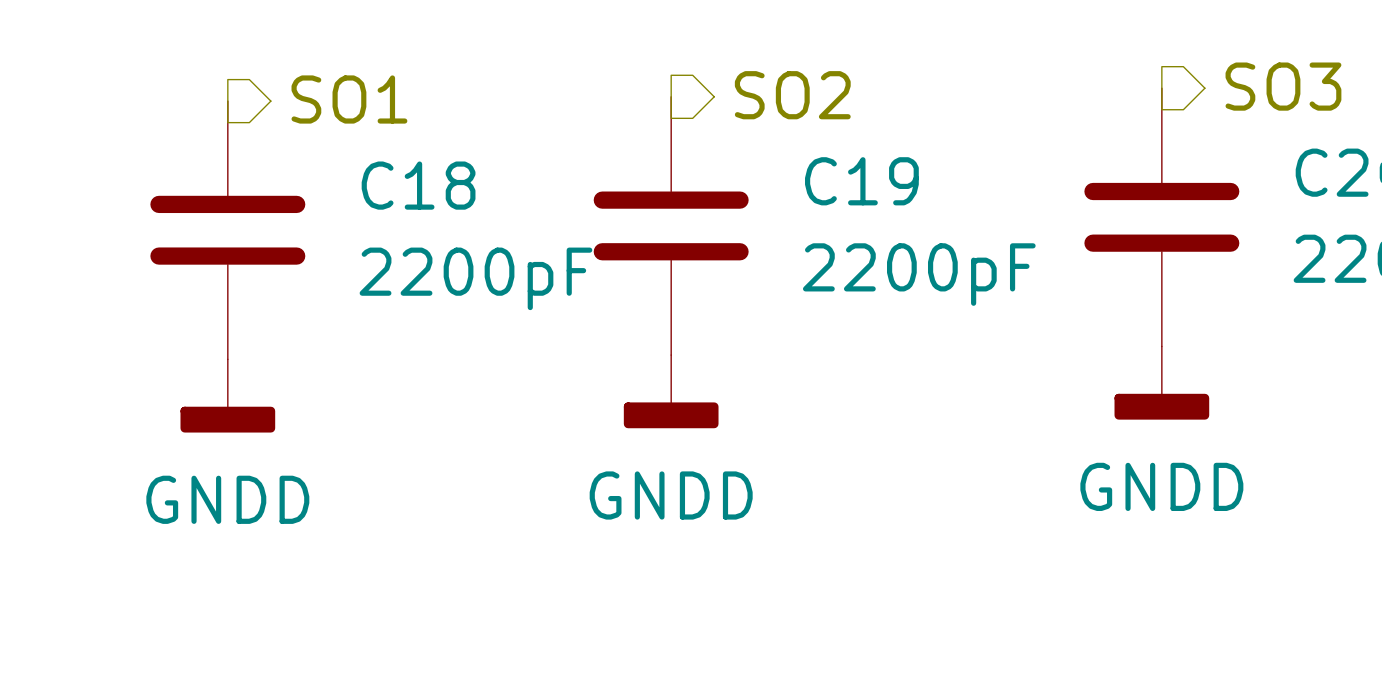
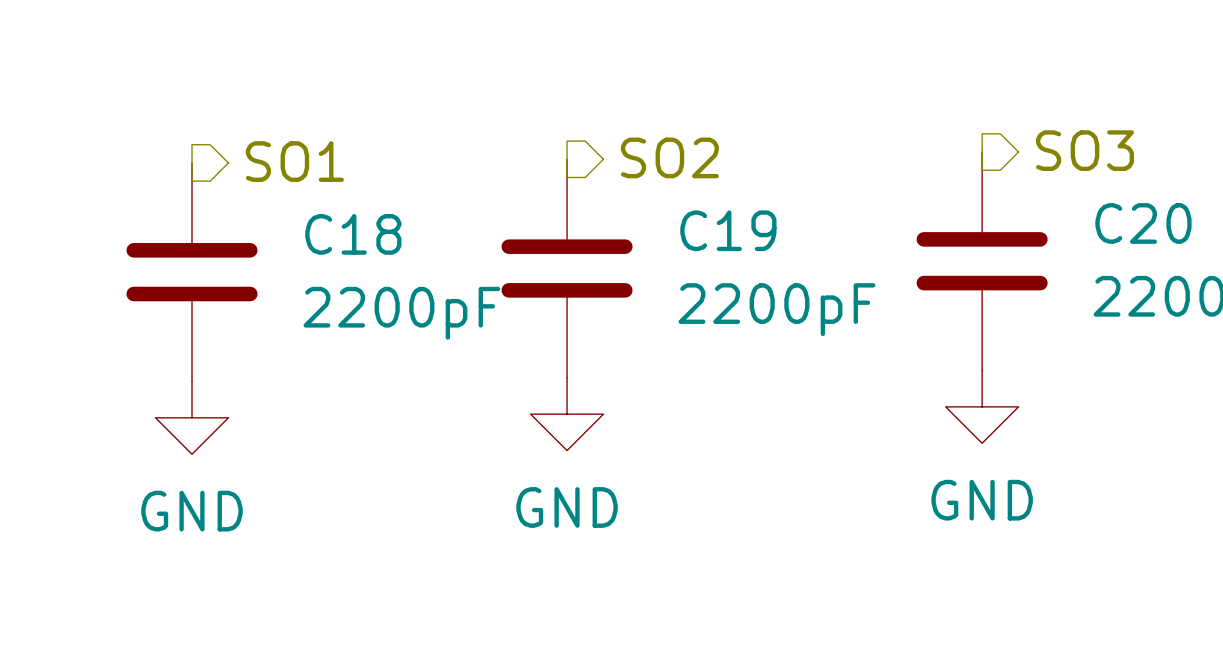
power symbol: GNDD (1161, 383) -> GND (982, 406)
power symbol: GNDD (671, 391) -> GND (567, 414)
power symbol: GNDD (227, 395) -> GND (192, 417)

